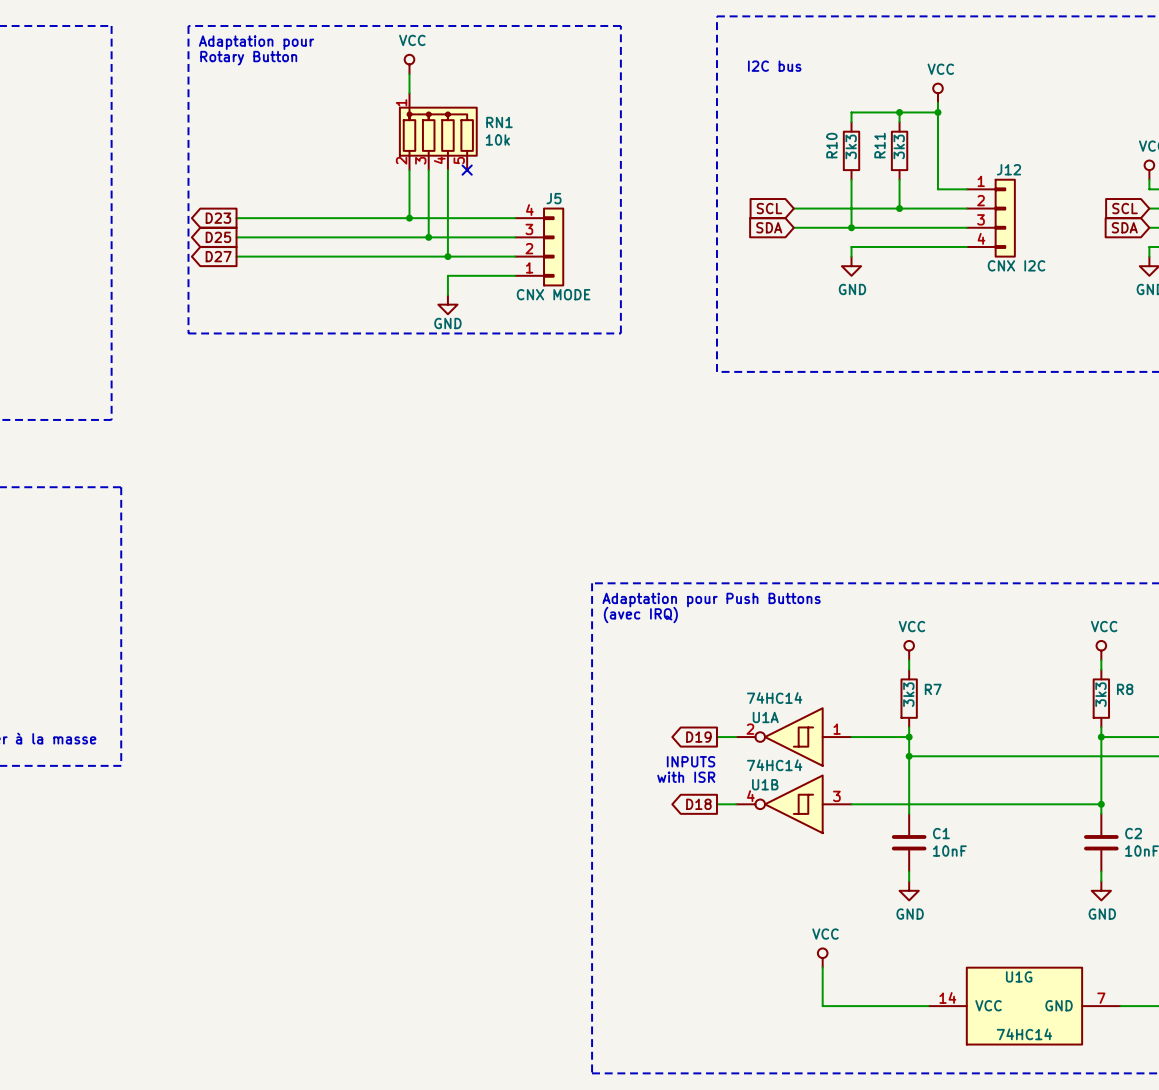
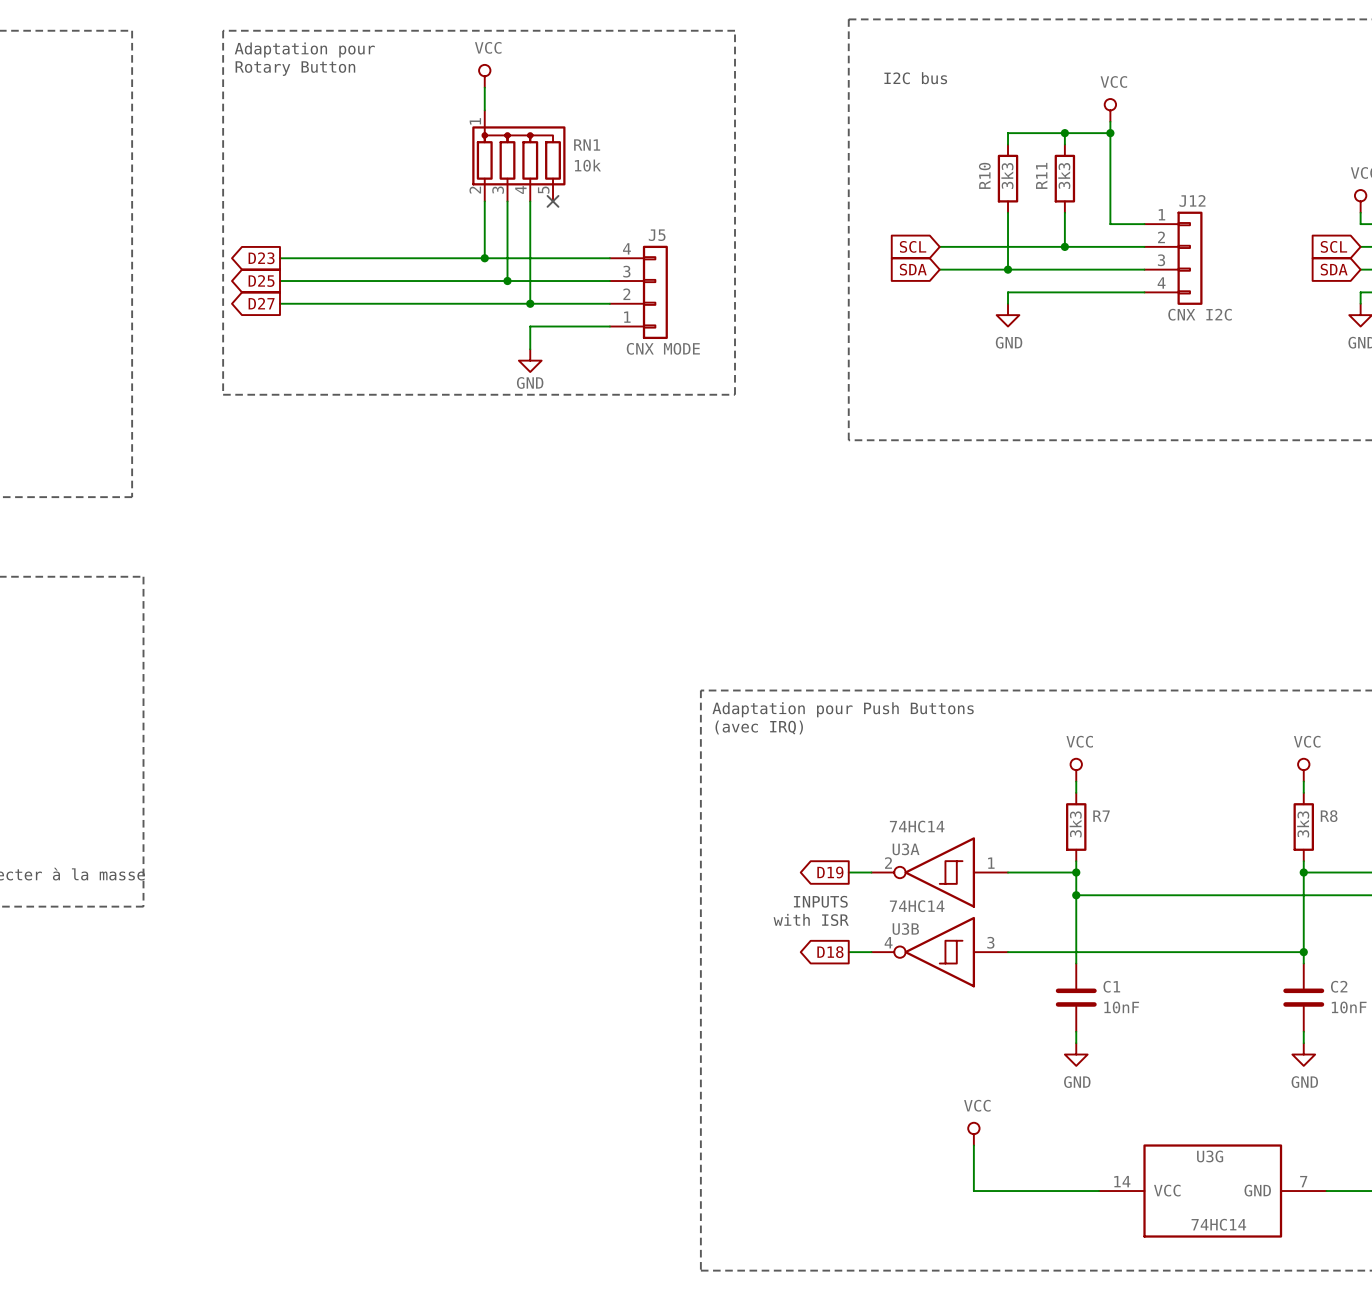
U1A name: U1A (765, 717) -> U3A (906, 849)
U1B name: U1B (765, 784) -> U3B (905, 928)
U1G name: U1G (1019, 976) -> U3G (1210, 1156)

